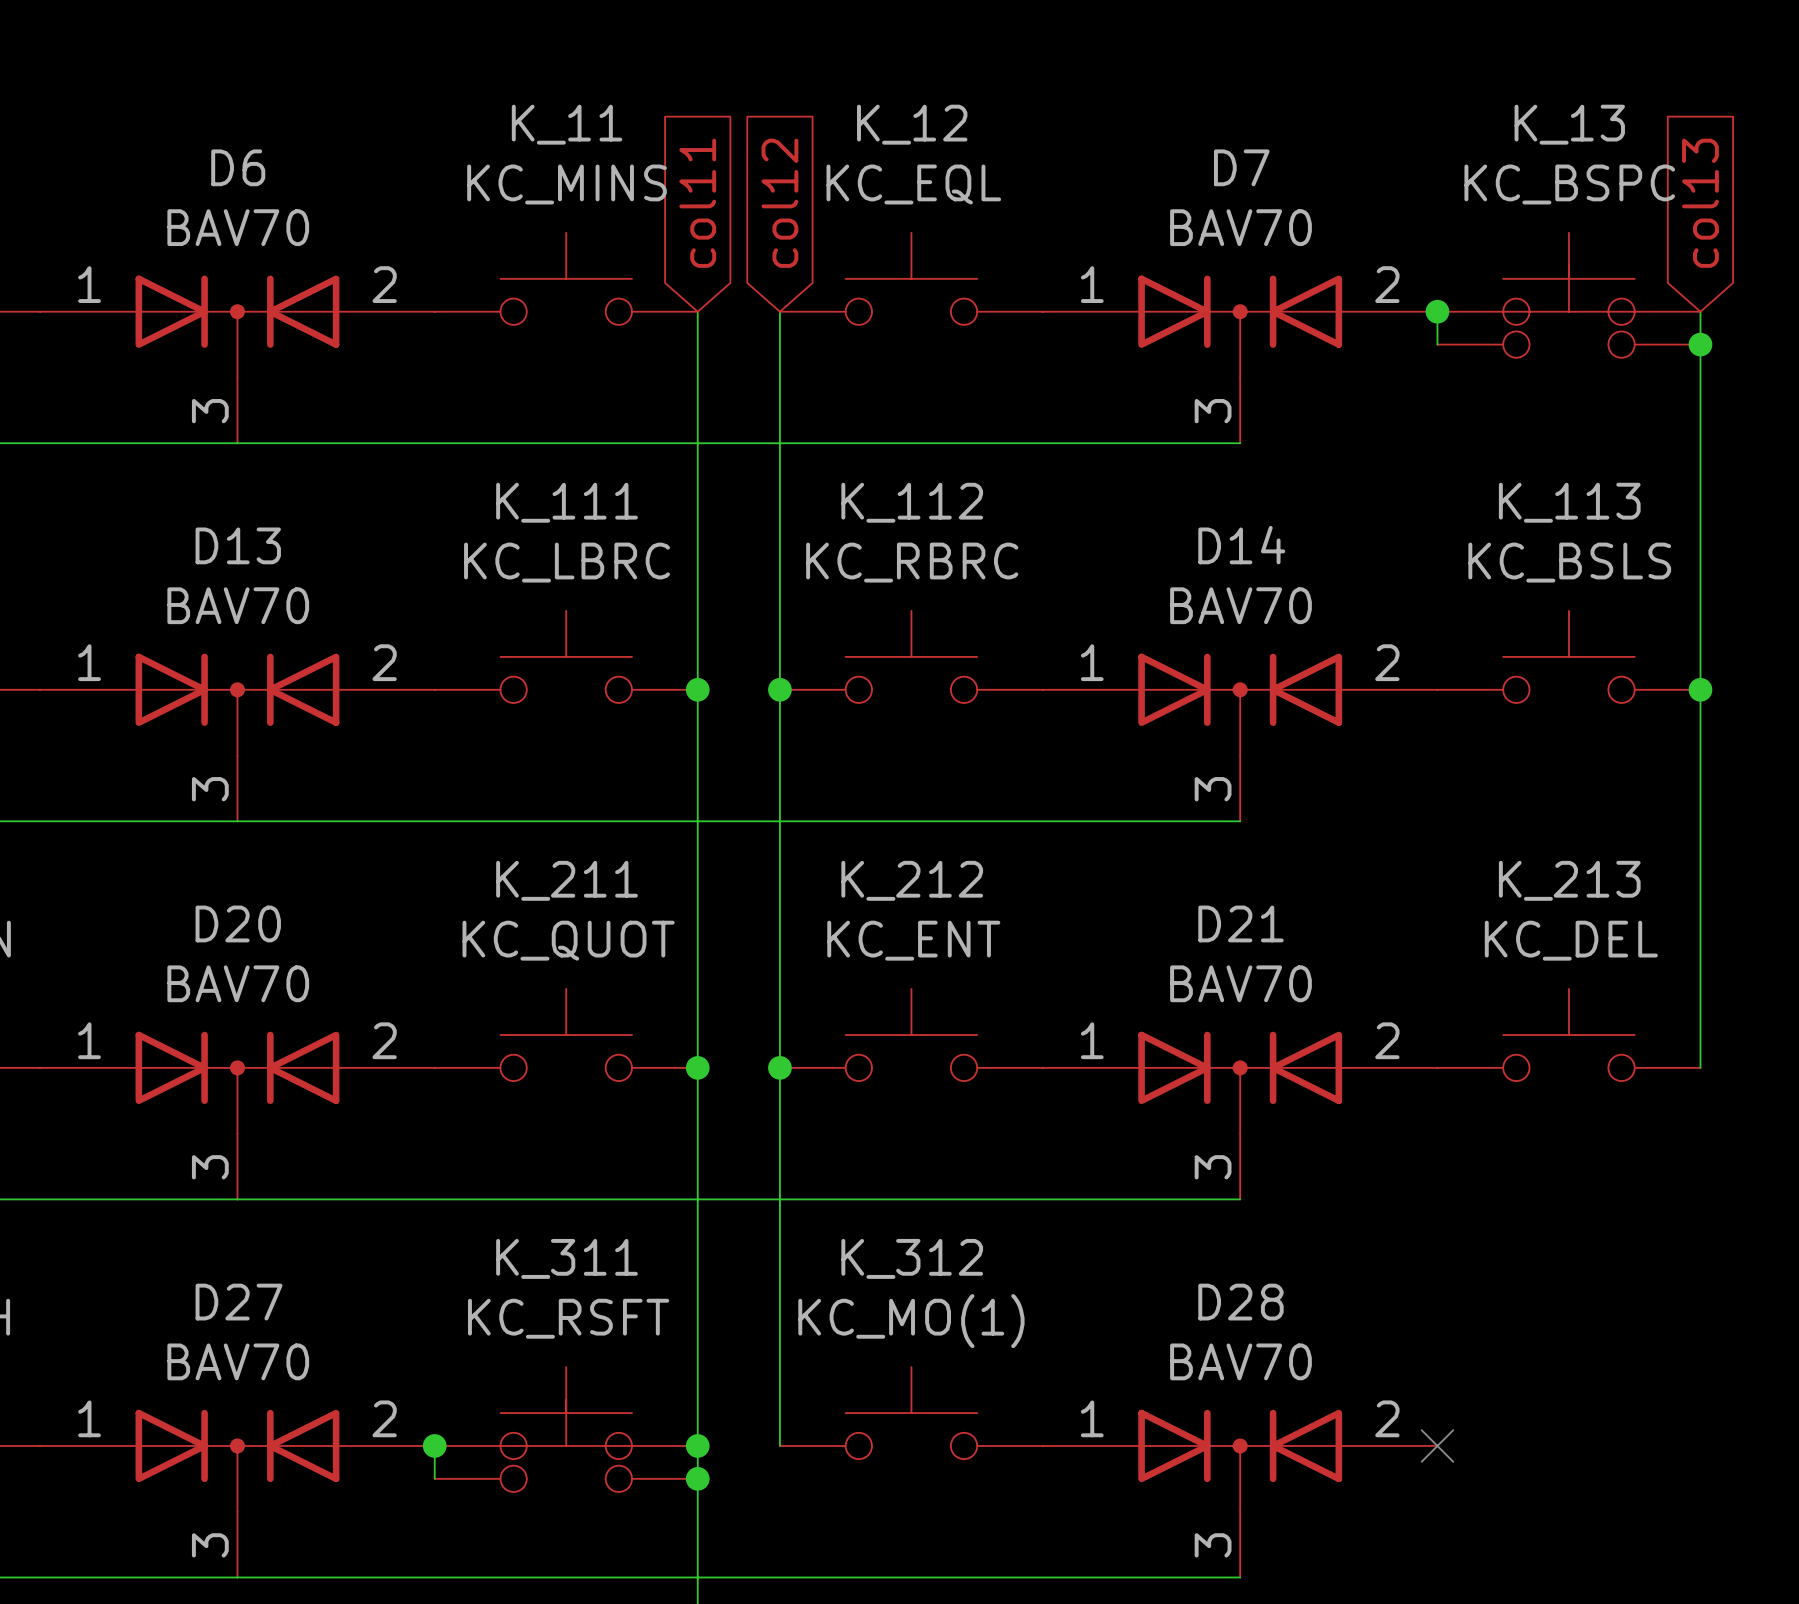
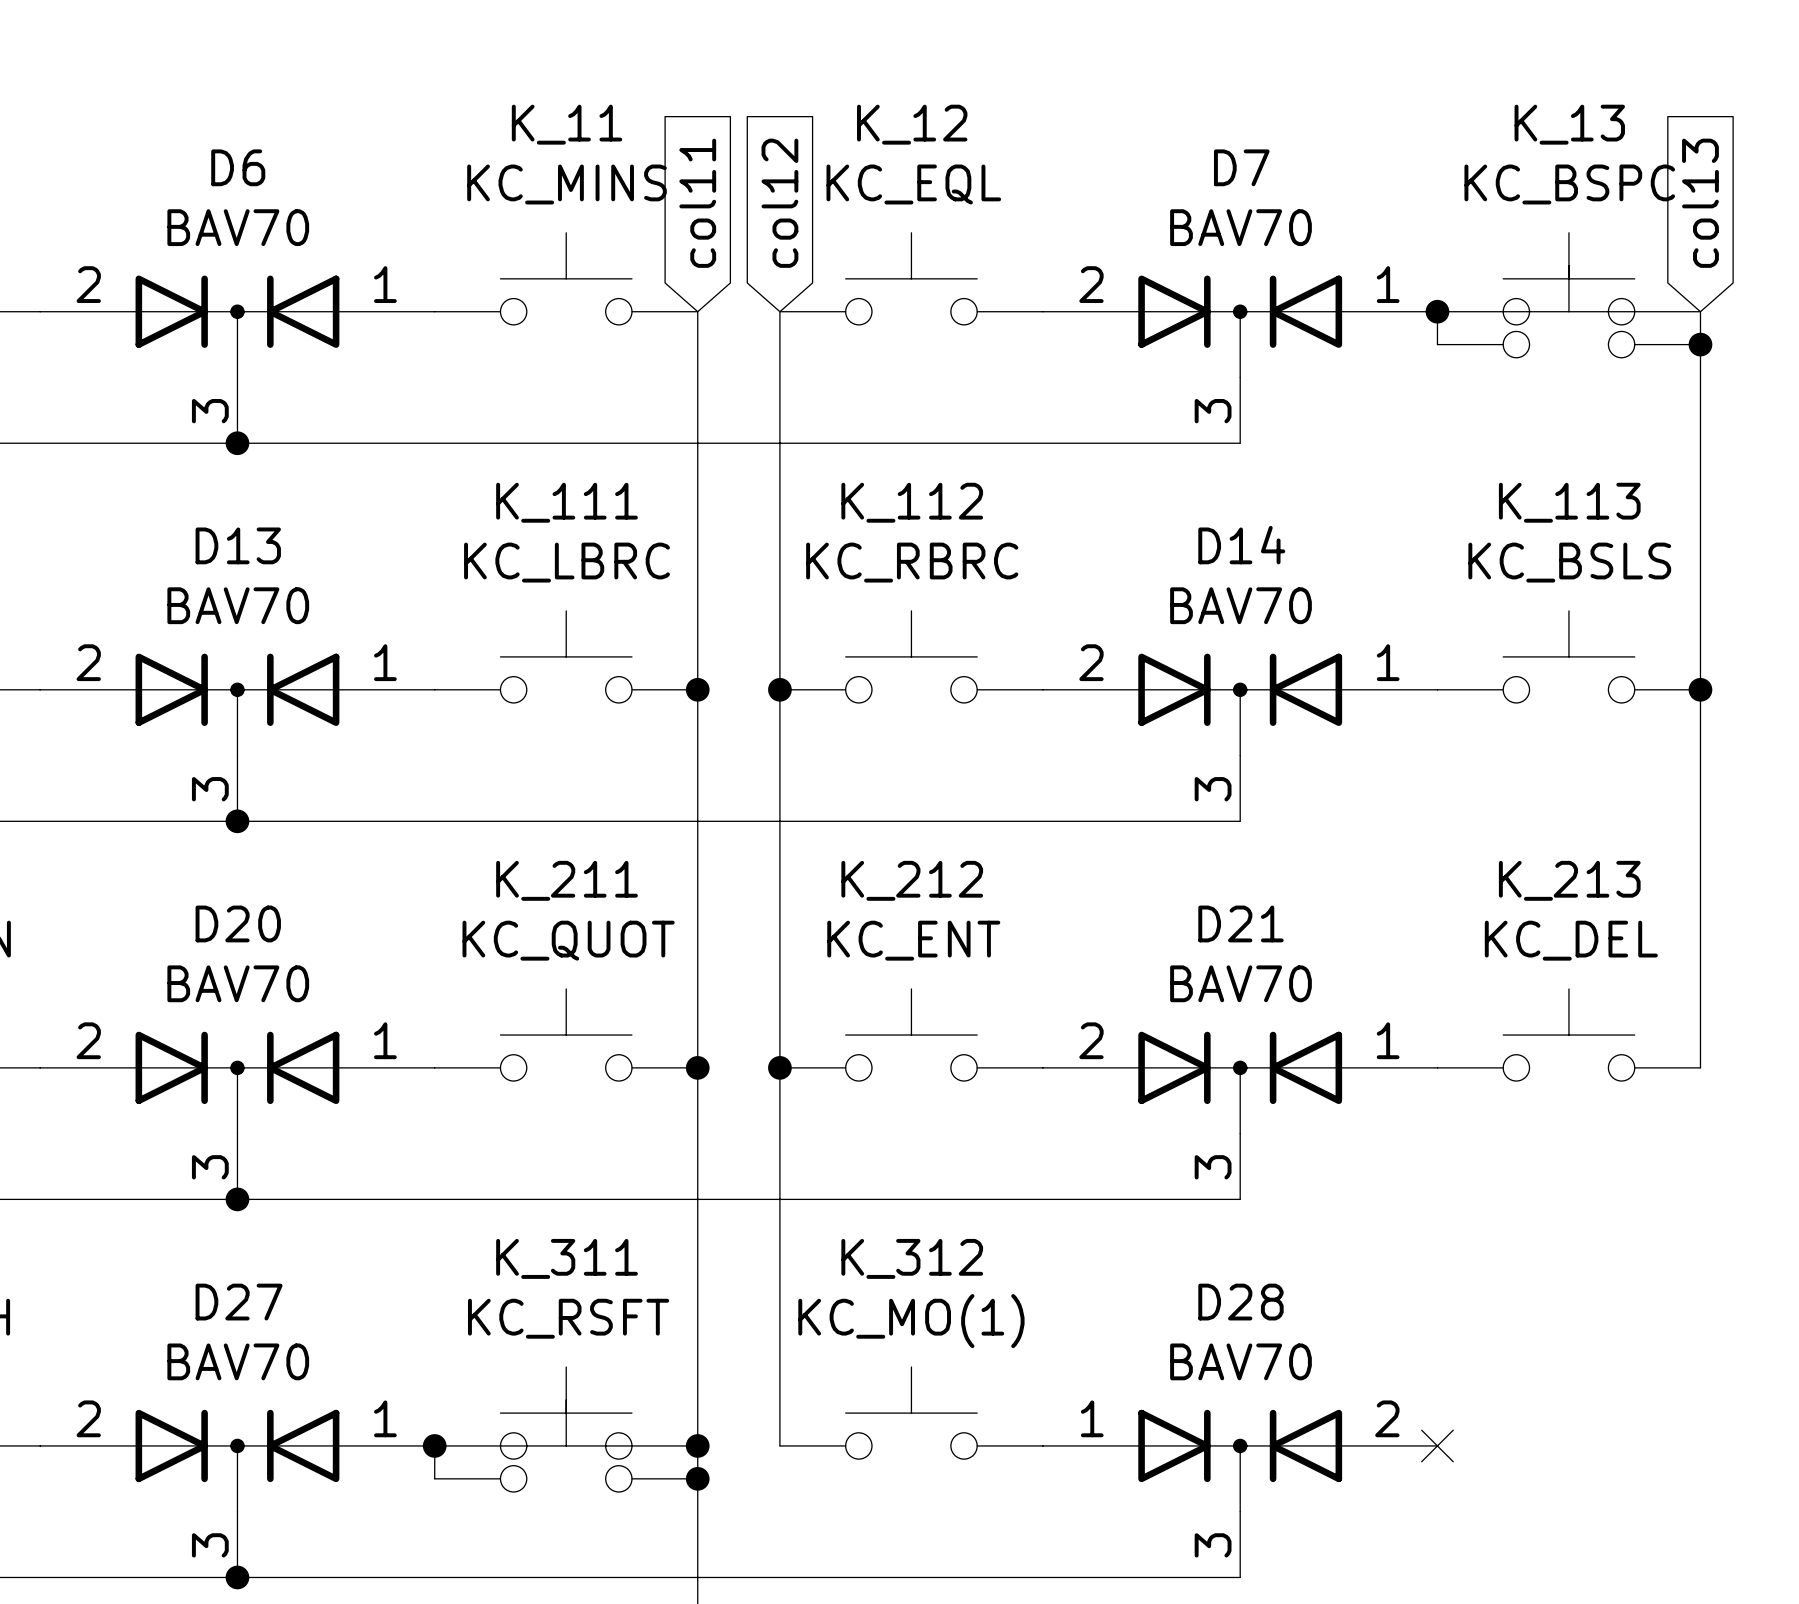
D6 flip: as is (237, 326) -> left-right (237, 326)
D7 flip: as is (1240, 326) -> left-right (1240, 326)
junction: none -> (237, 443)
D13 flip: as is (237, 704) -> left-right (237, 704)
D14 flip: as is (1240, 704) -> left-right (1240, 704)
junction: none -> (237, 821)
D20 flip: as is (237, 1082) -> left-right (237, 1082)
D21 flip: as is (1240, 1082) -> left-right (1240, 1082)
junction: none -> (237, 1199)
D27 flip: as is (237, 1460) -> left-right (237, 1460)
junction: none -> (237, 1577)

